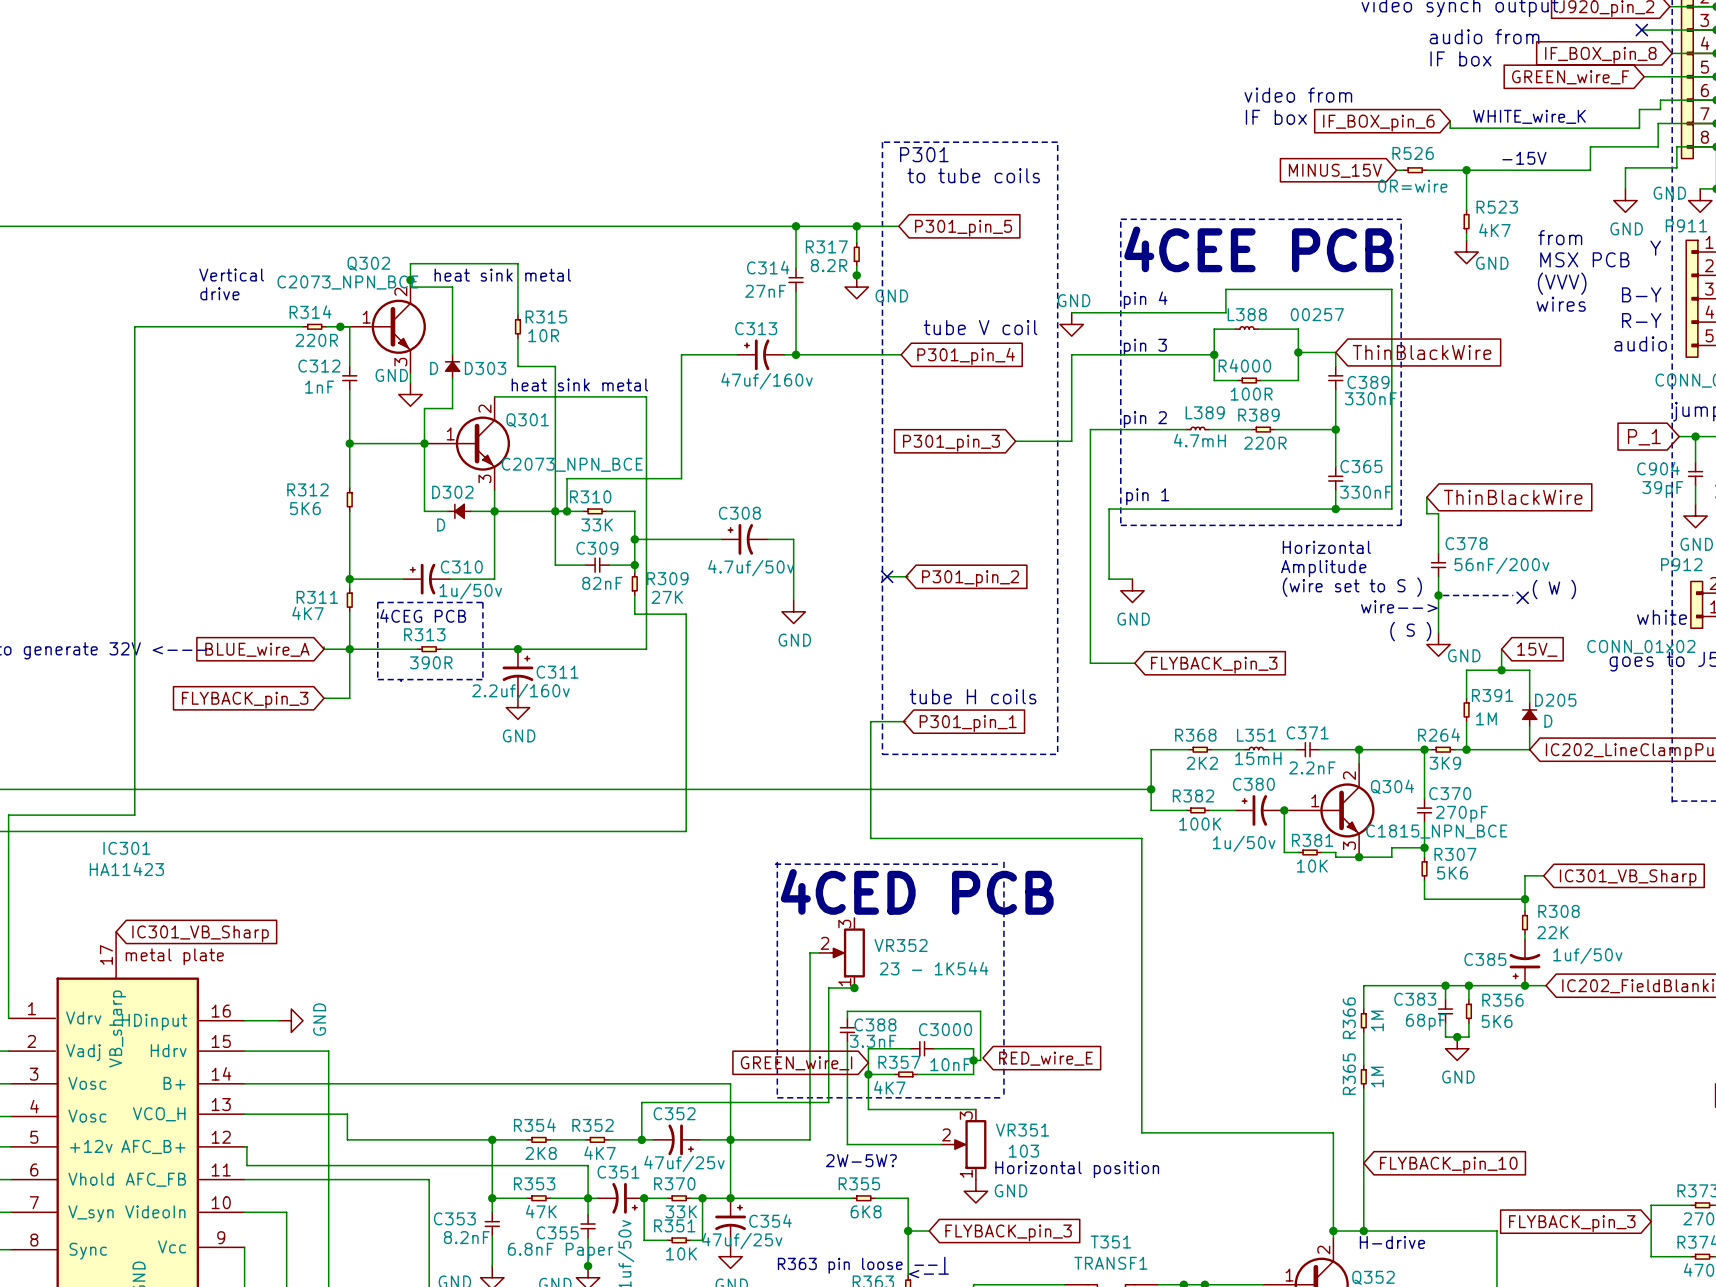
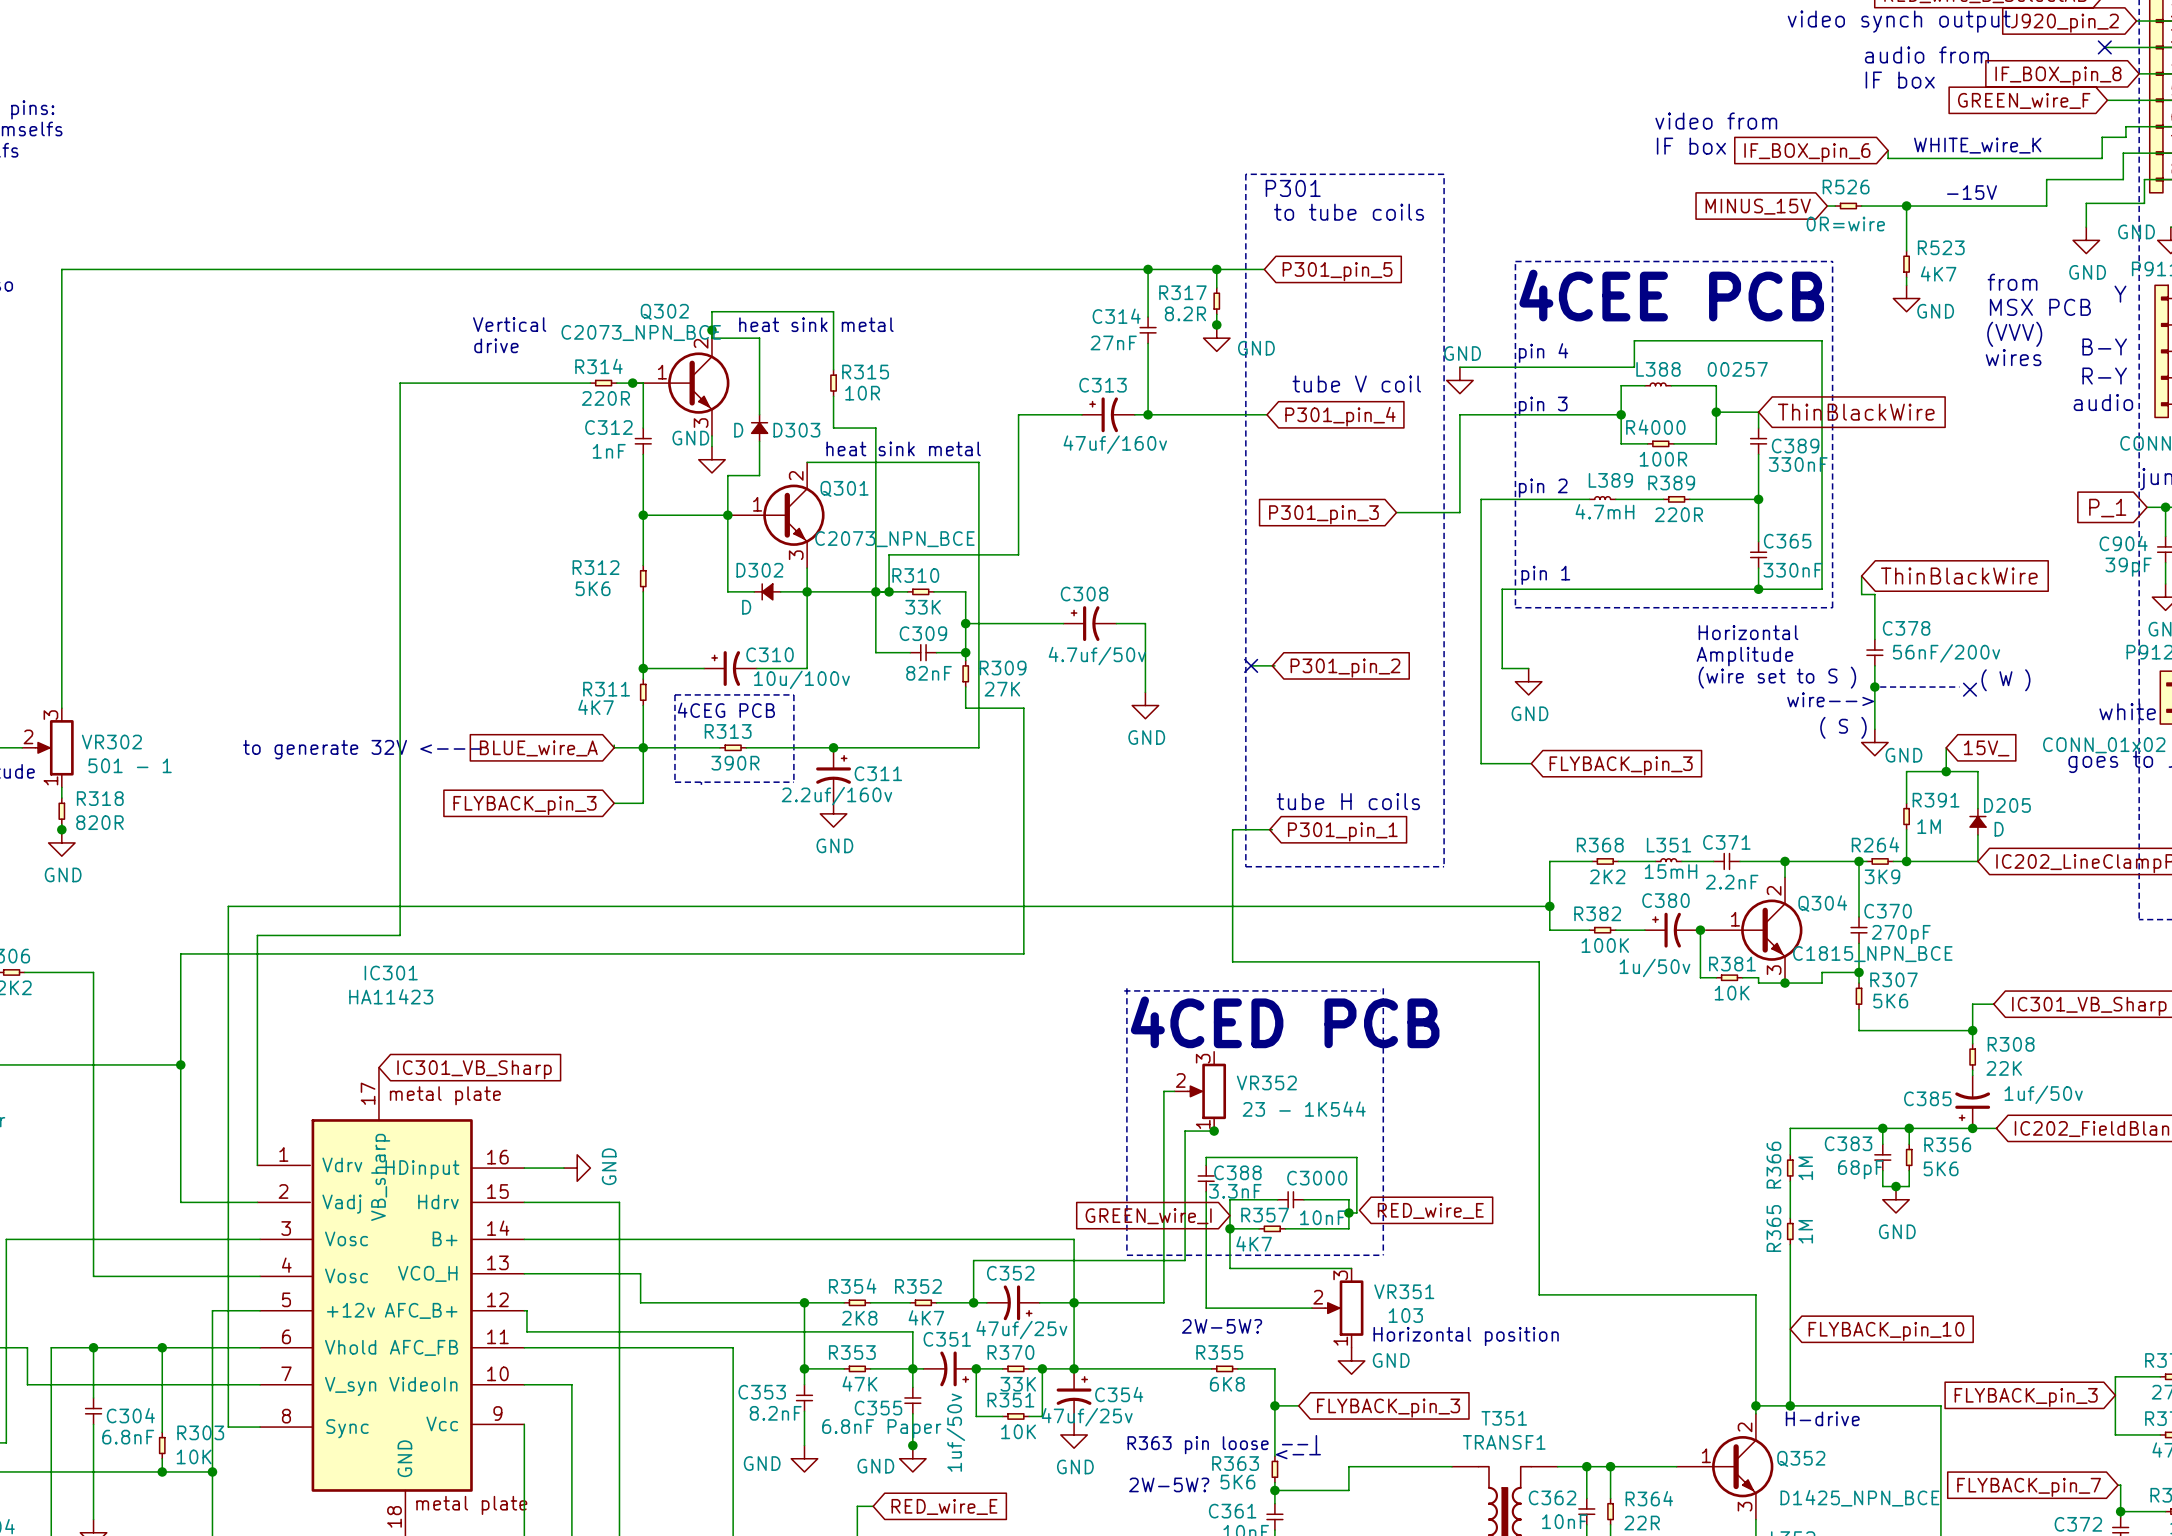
C310 value: 1u/50v (470, 591) -> 10u/100v (801, 679)

